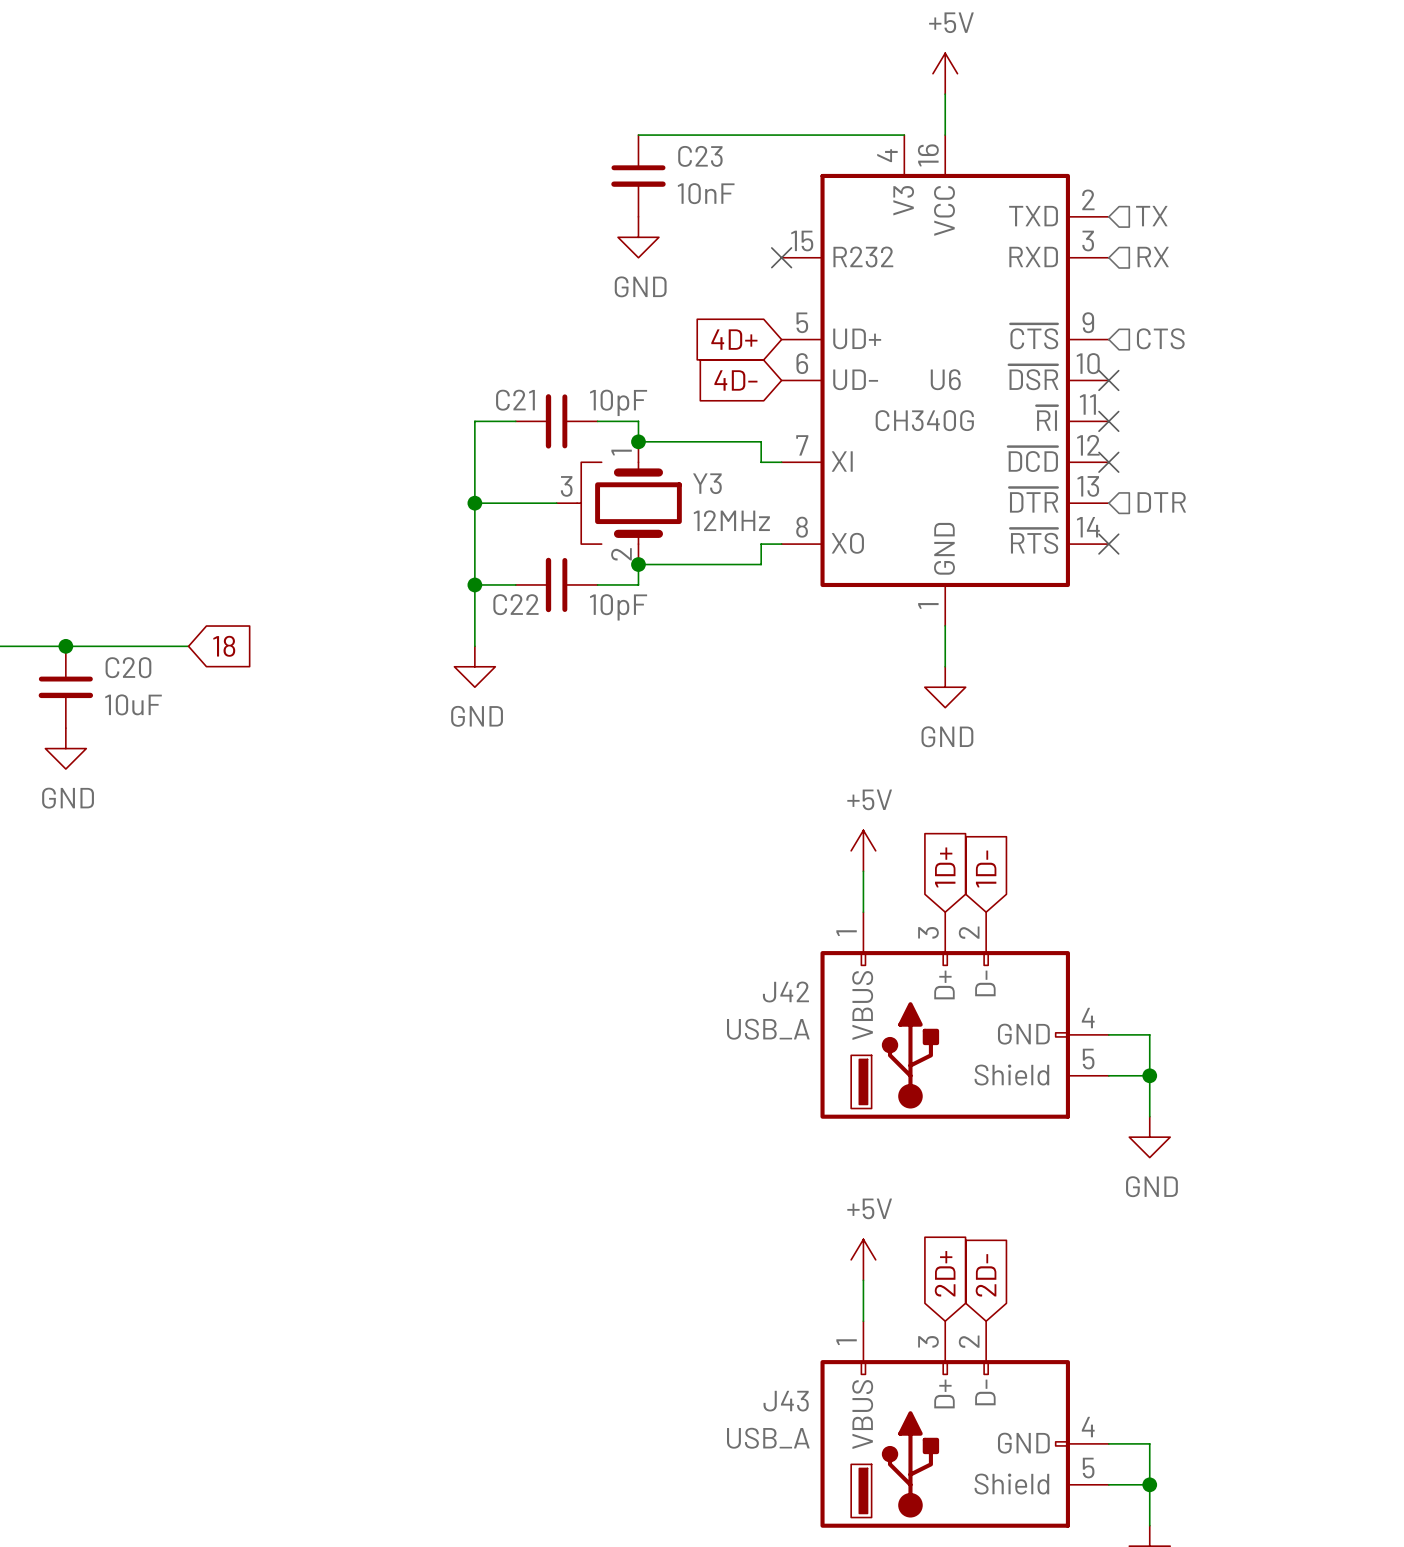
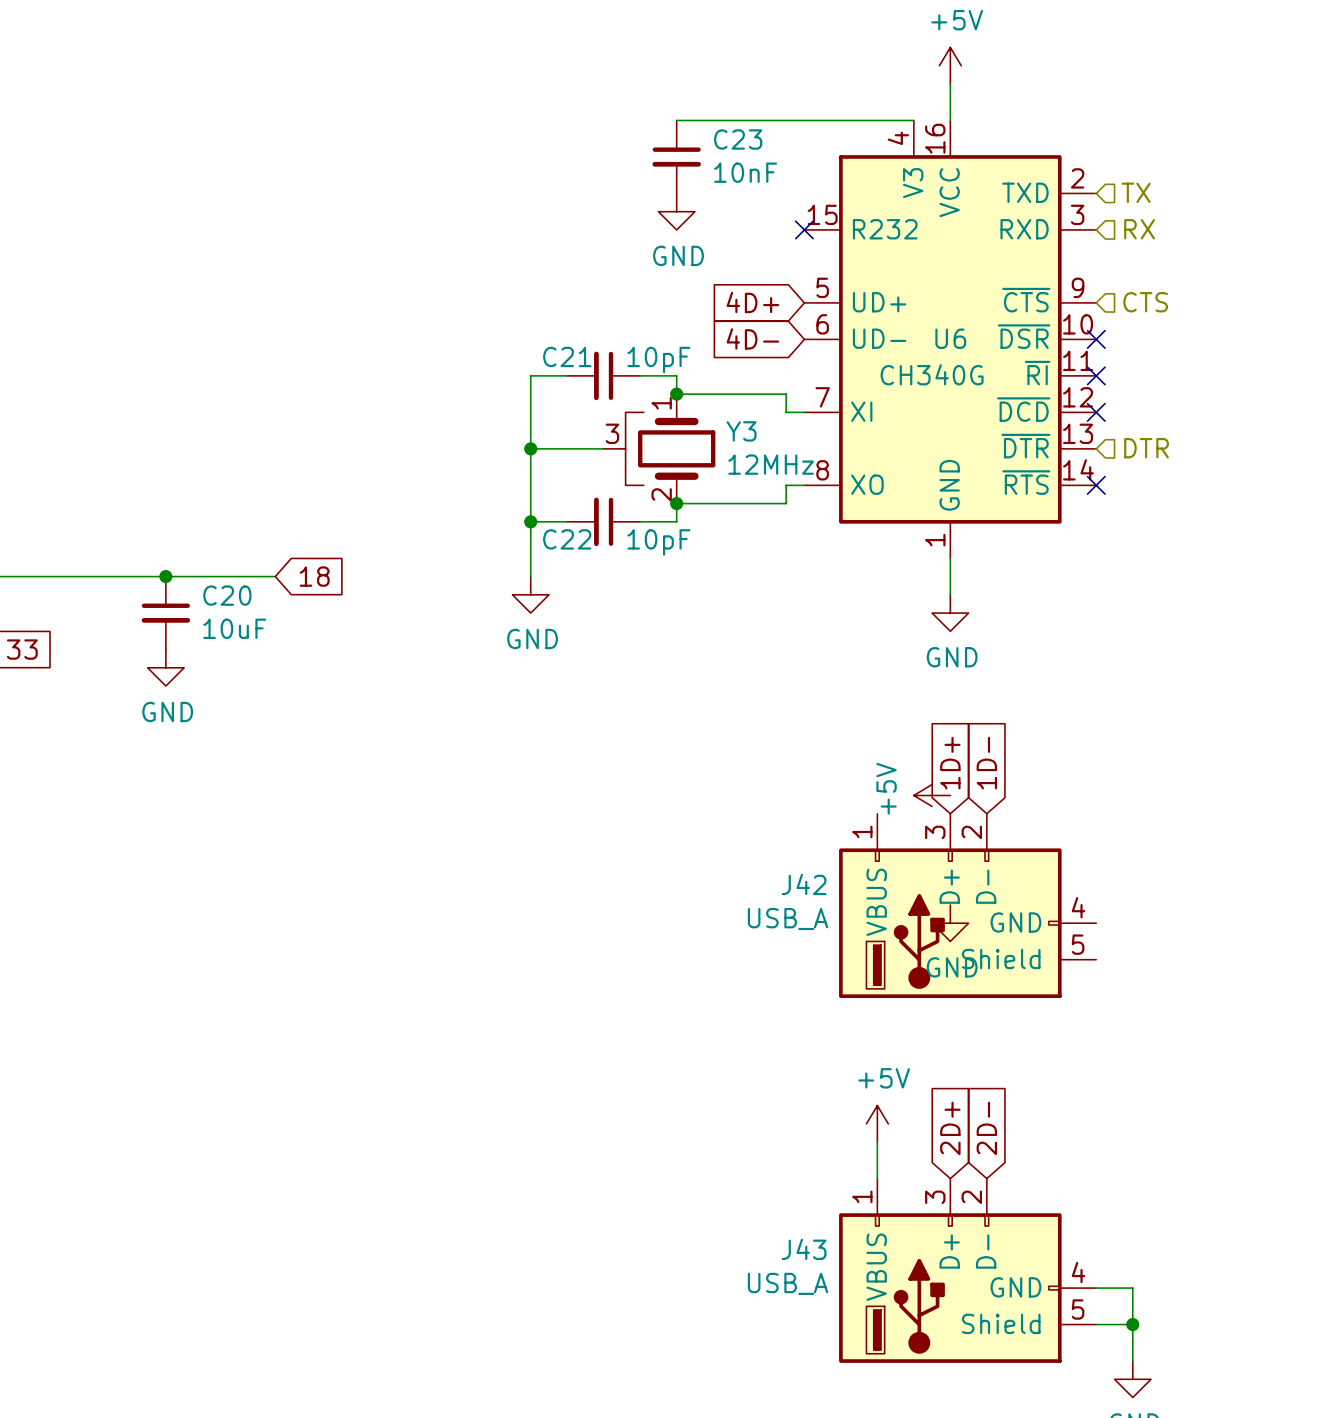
power symbol rotation: 0° (863, 850) -> 90° counterclockwise (932, 795)
power symbol position: +5V (863, 850) -> +5V (932, 795)
wire: (863, 871) (863, 912) -> none
wire: (1108, 1034) (1149, 1034) (1149, 1116) -> none
wire: (1108, 1075) (1149, 1075) -> none
junction: (1149, 1075) -> none
power symbol position: GND (1149, 1137) -> GND (950, 923)

